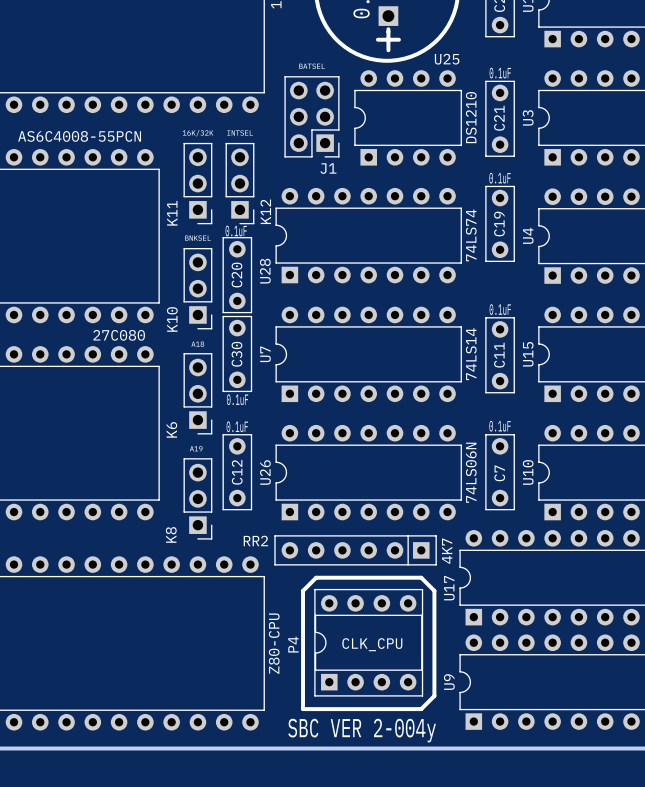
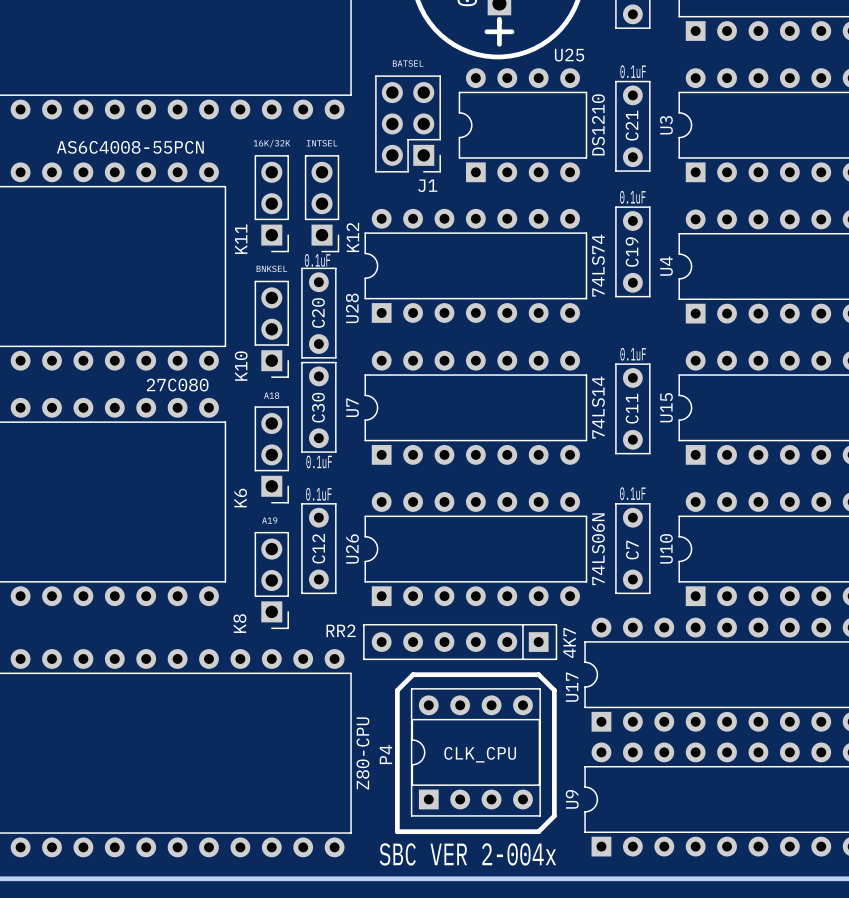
text: SBC VER 2-004y (362, 730) -> SBC VER 2-004x (467, 854)

